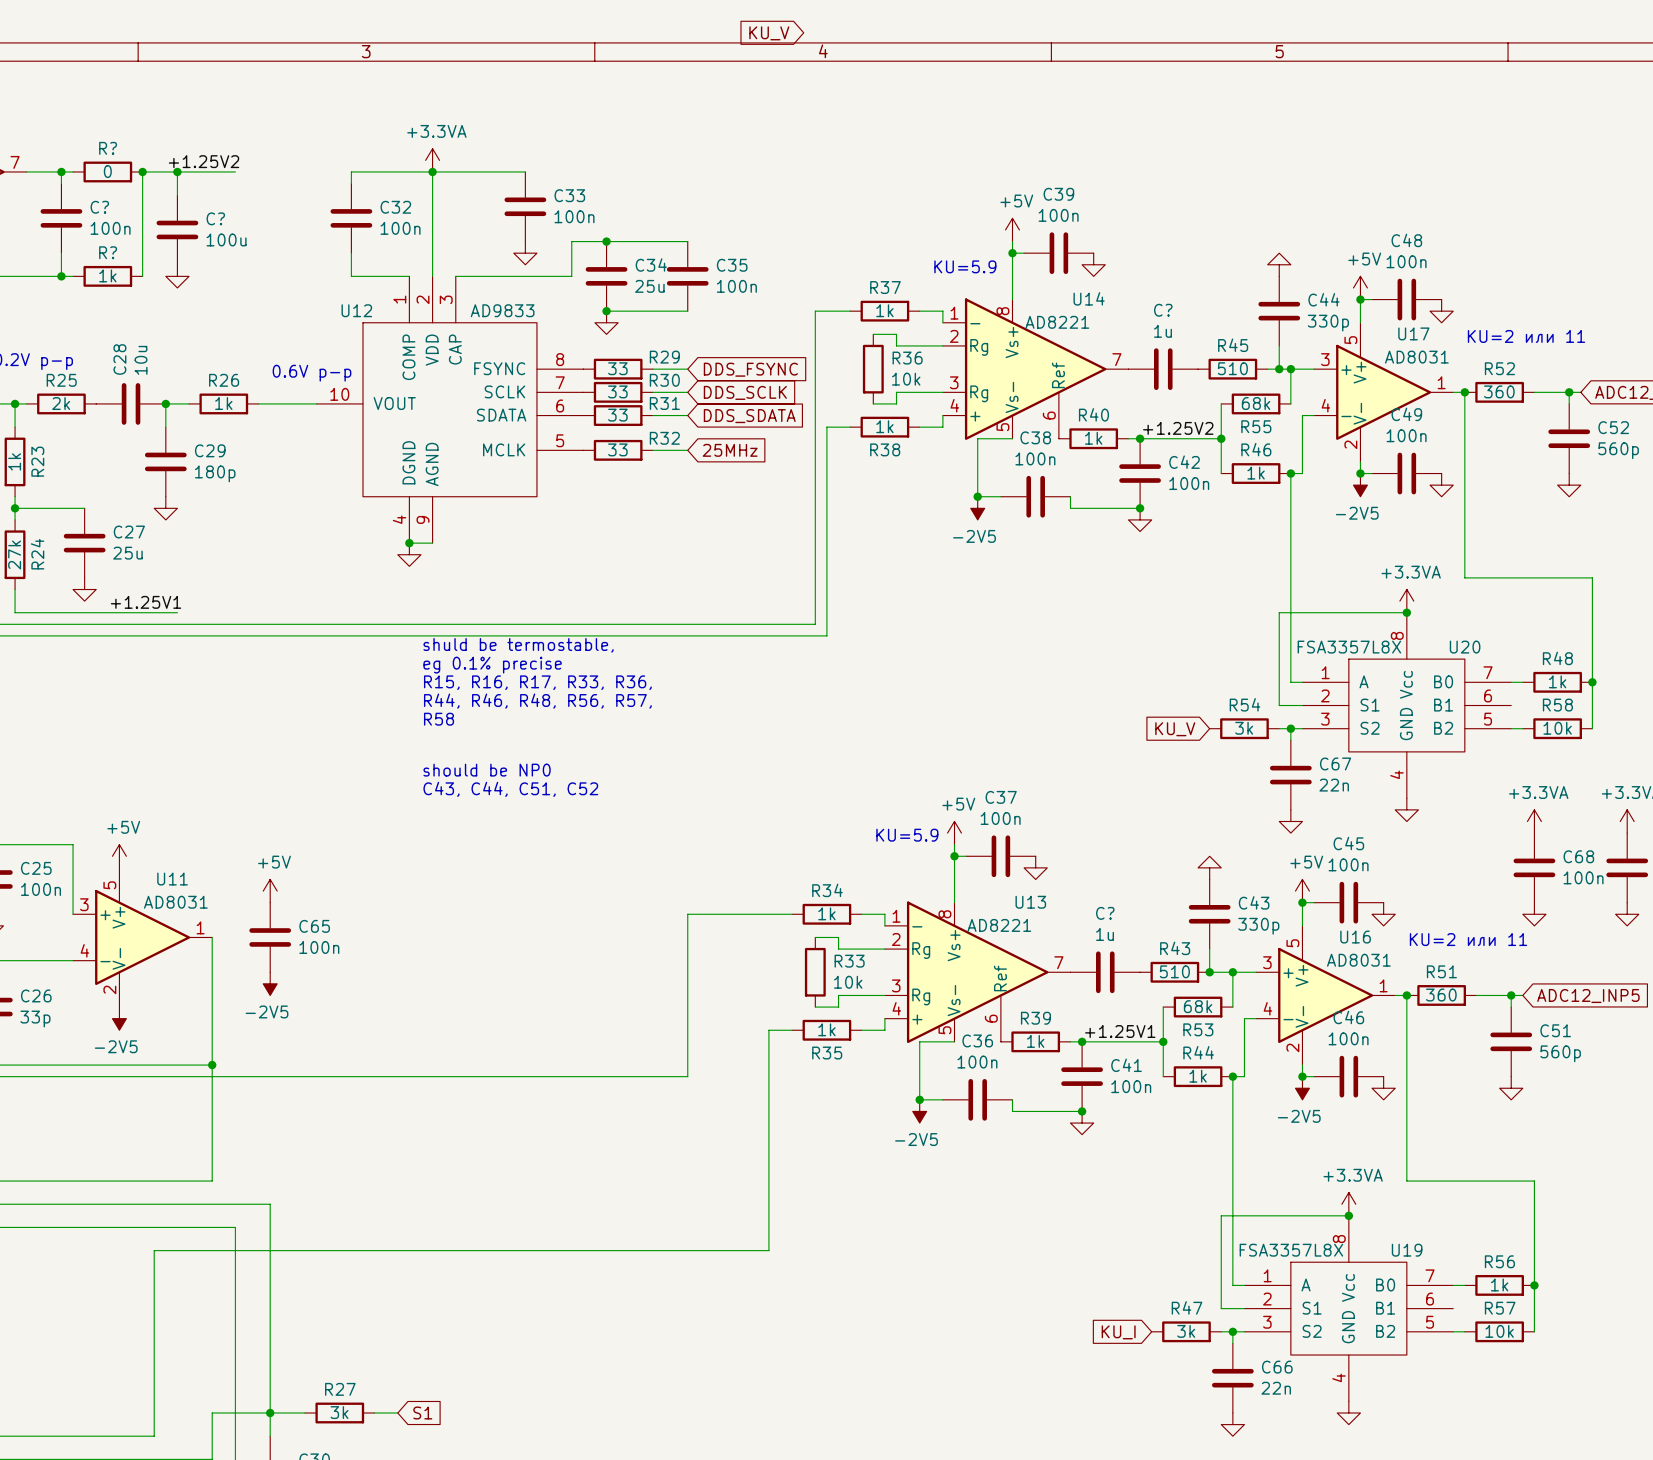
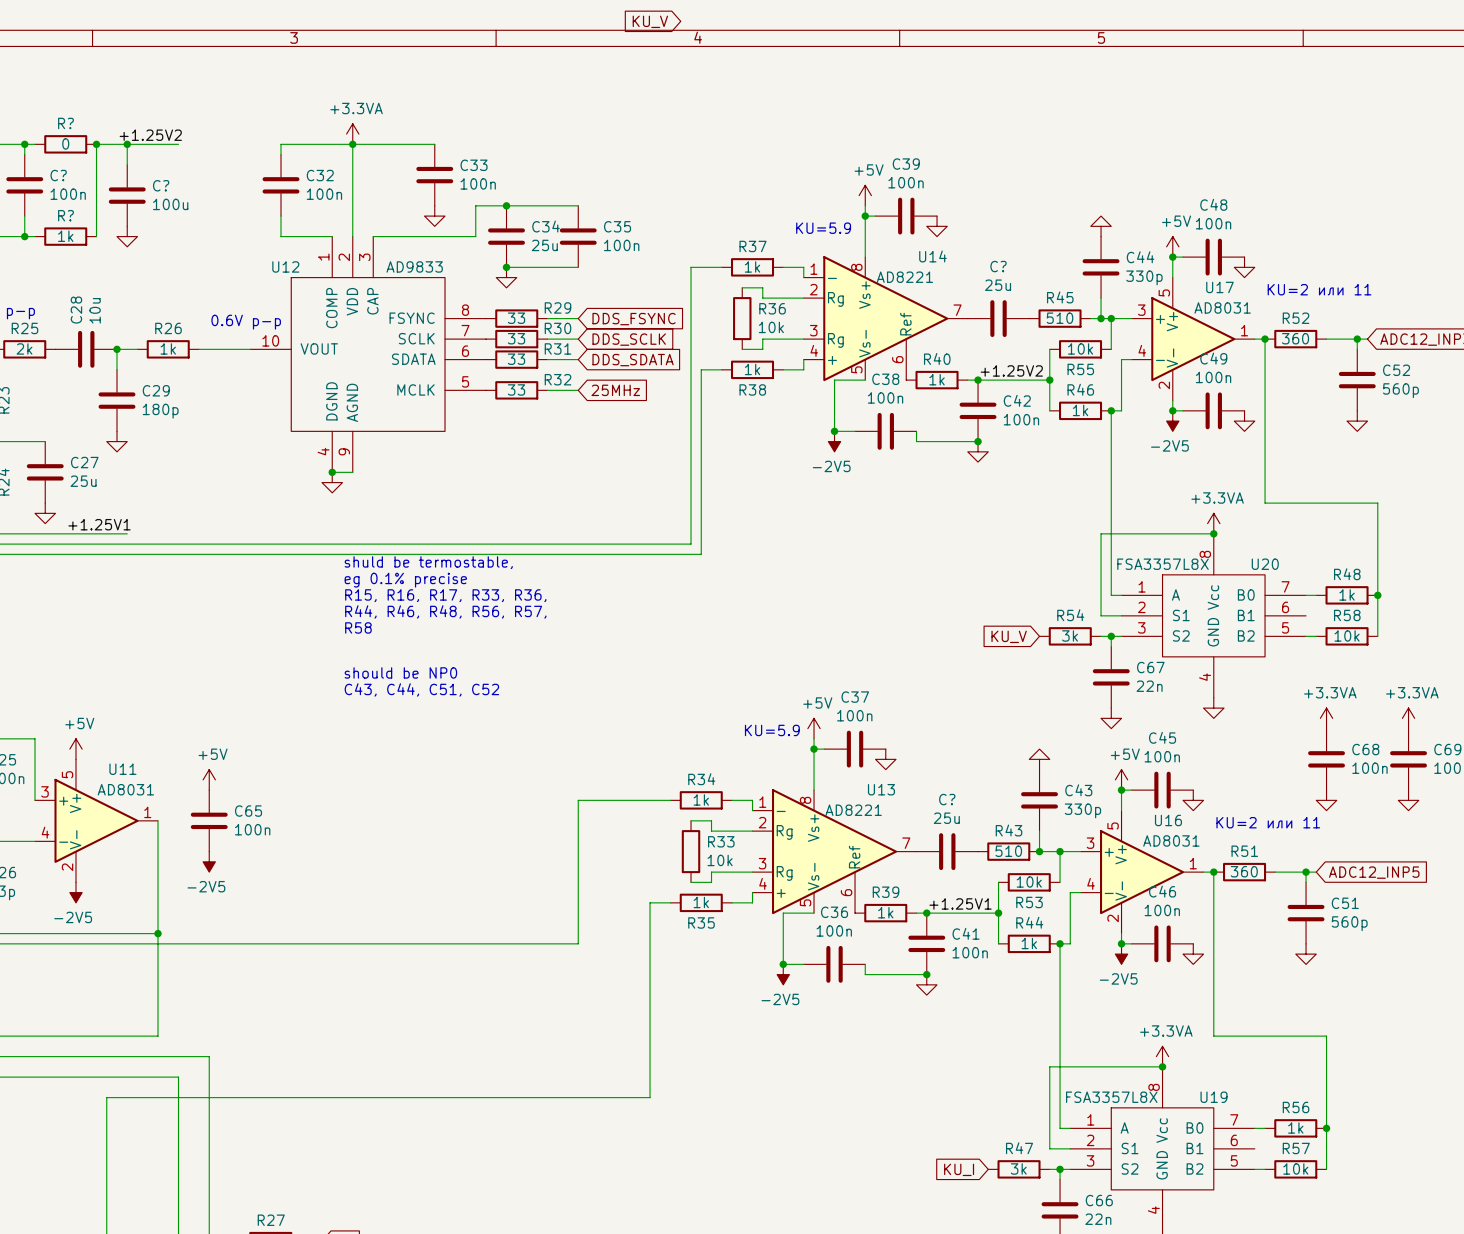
C? value: 1u (1163, 331) -> 25u (998, 285)
R55 value: 68k (1256, 403) -> 10k (1080, 348)
C? value: 1u (1105, 934) -> 25u (946, 818)
R53 value: 68k (1198, 1006) -> 10k (1029, 881)

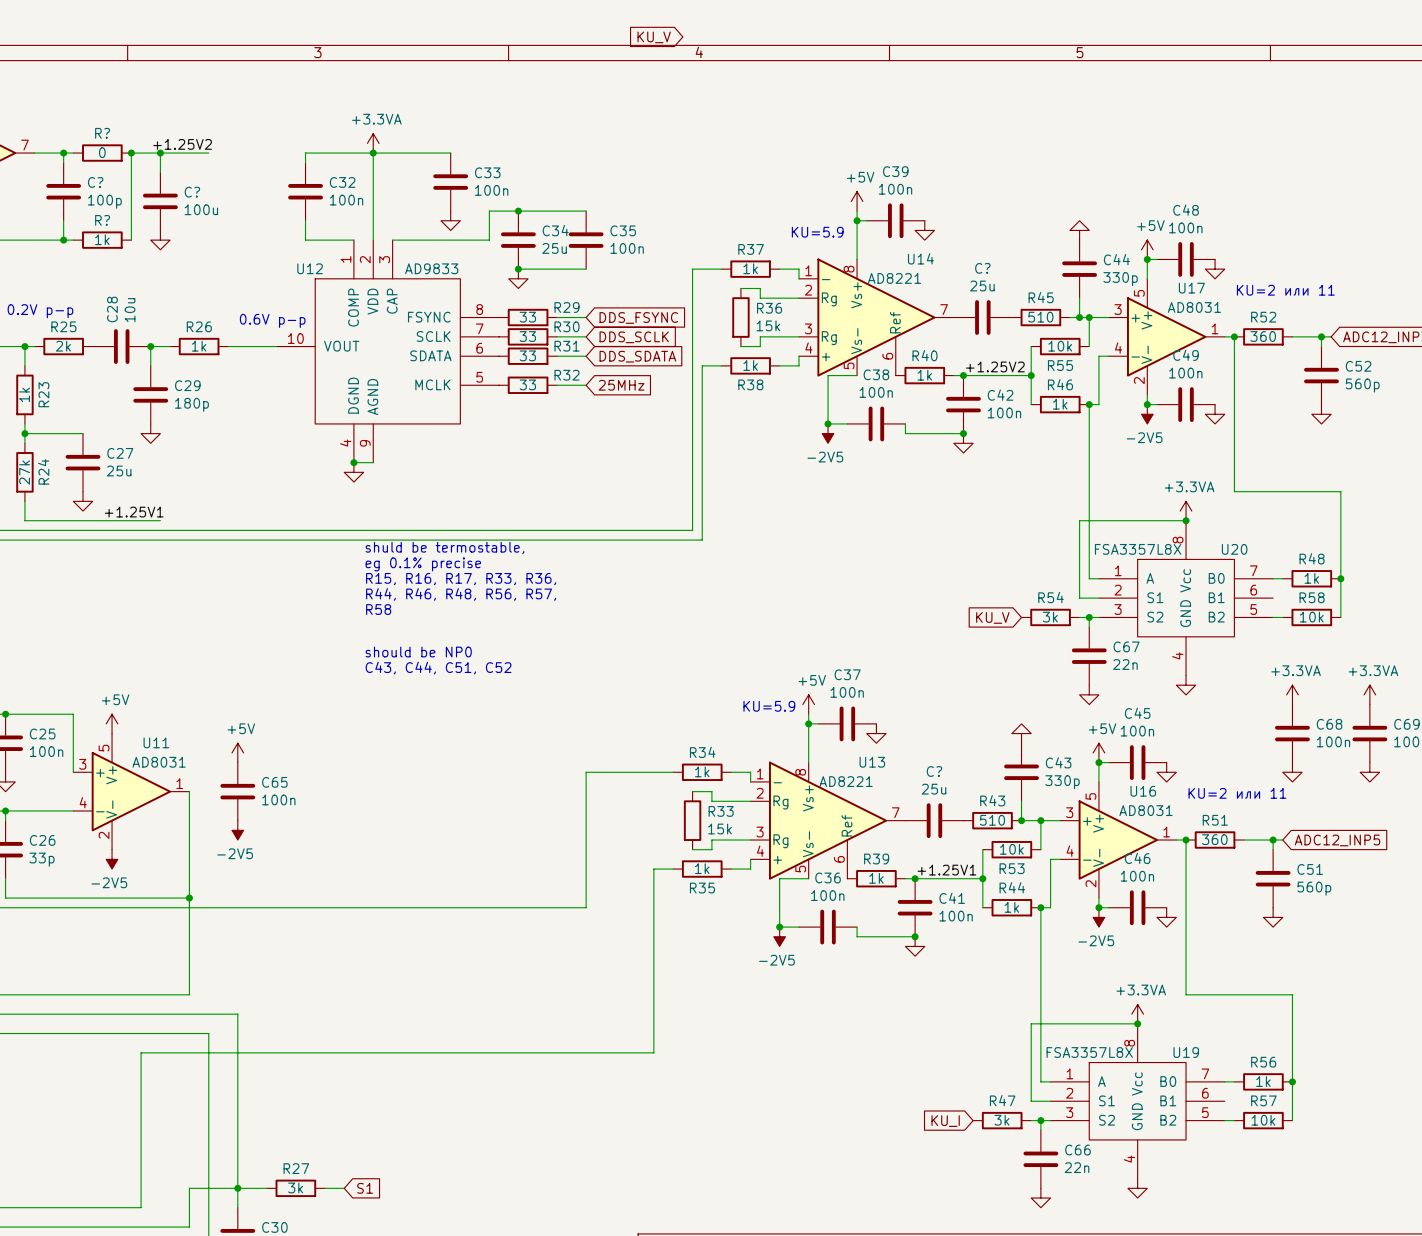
C? value: 100n (68, 194) -> 100p (104, 201)
R36 value: 10k (771, 327) -> 15k (768, 325)
R33 value: 10k (720, 860) -> 15k (720, 829)

